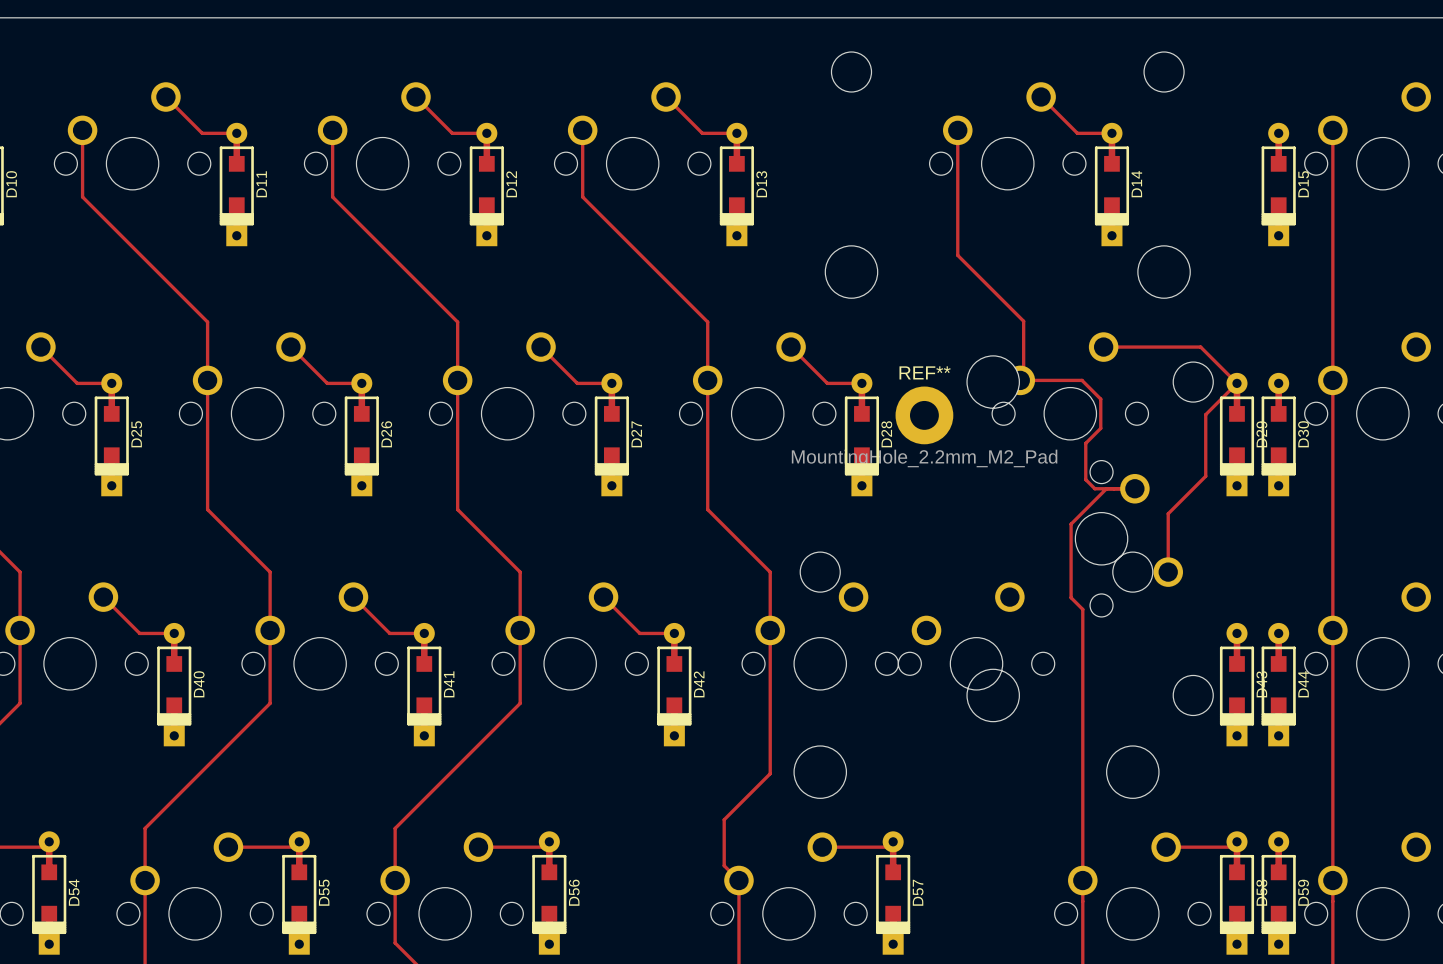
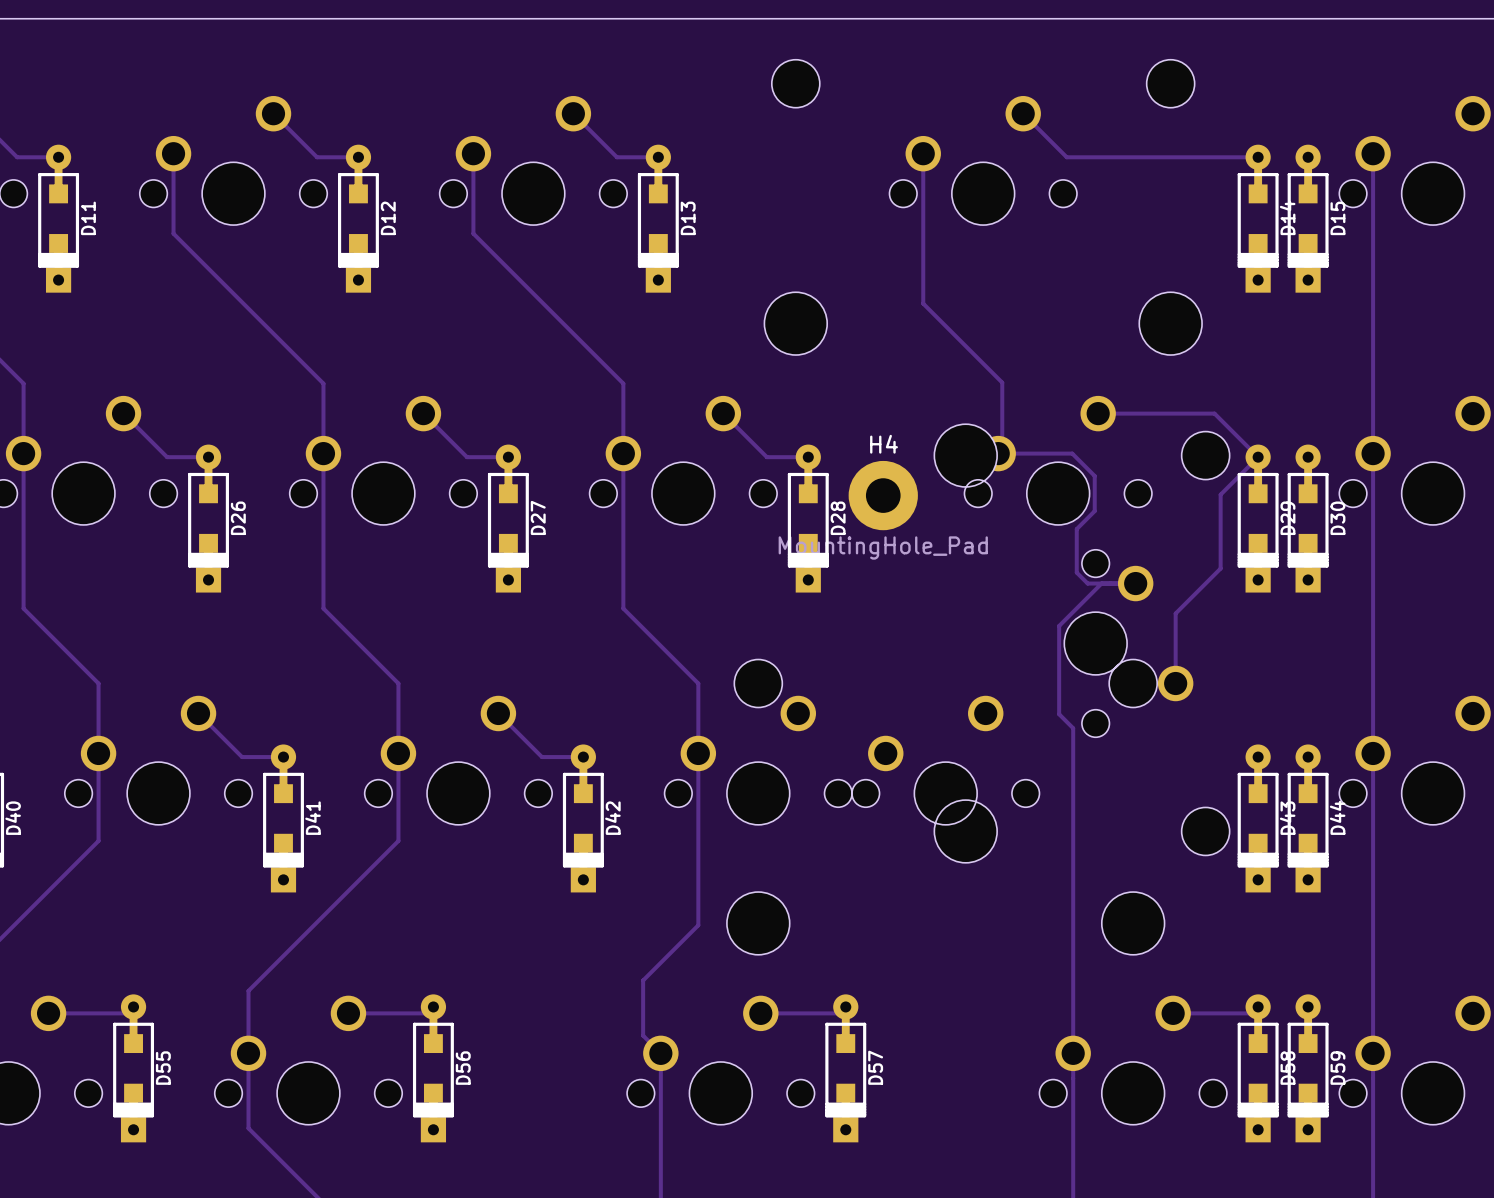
track: none -> (1108, 157) (1258, 157)
D14 position: (1111, 184) -> (1258, 218)
REF** name: REF** (925, 372) -> H4 (884, 444)
REF** value: MountingHole_2.2mm_M2_Pad (924, 458) -> MountingHole_Pad (883, 547)

